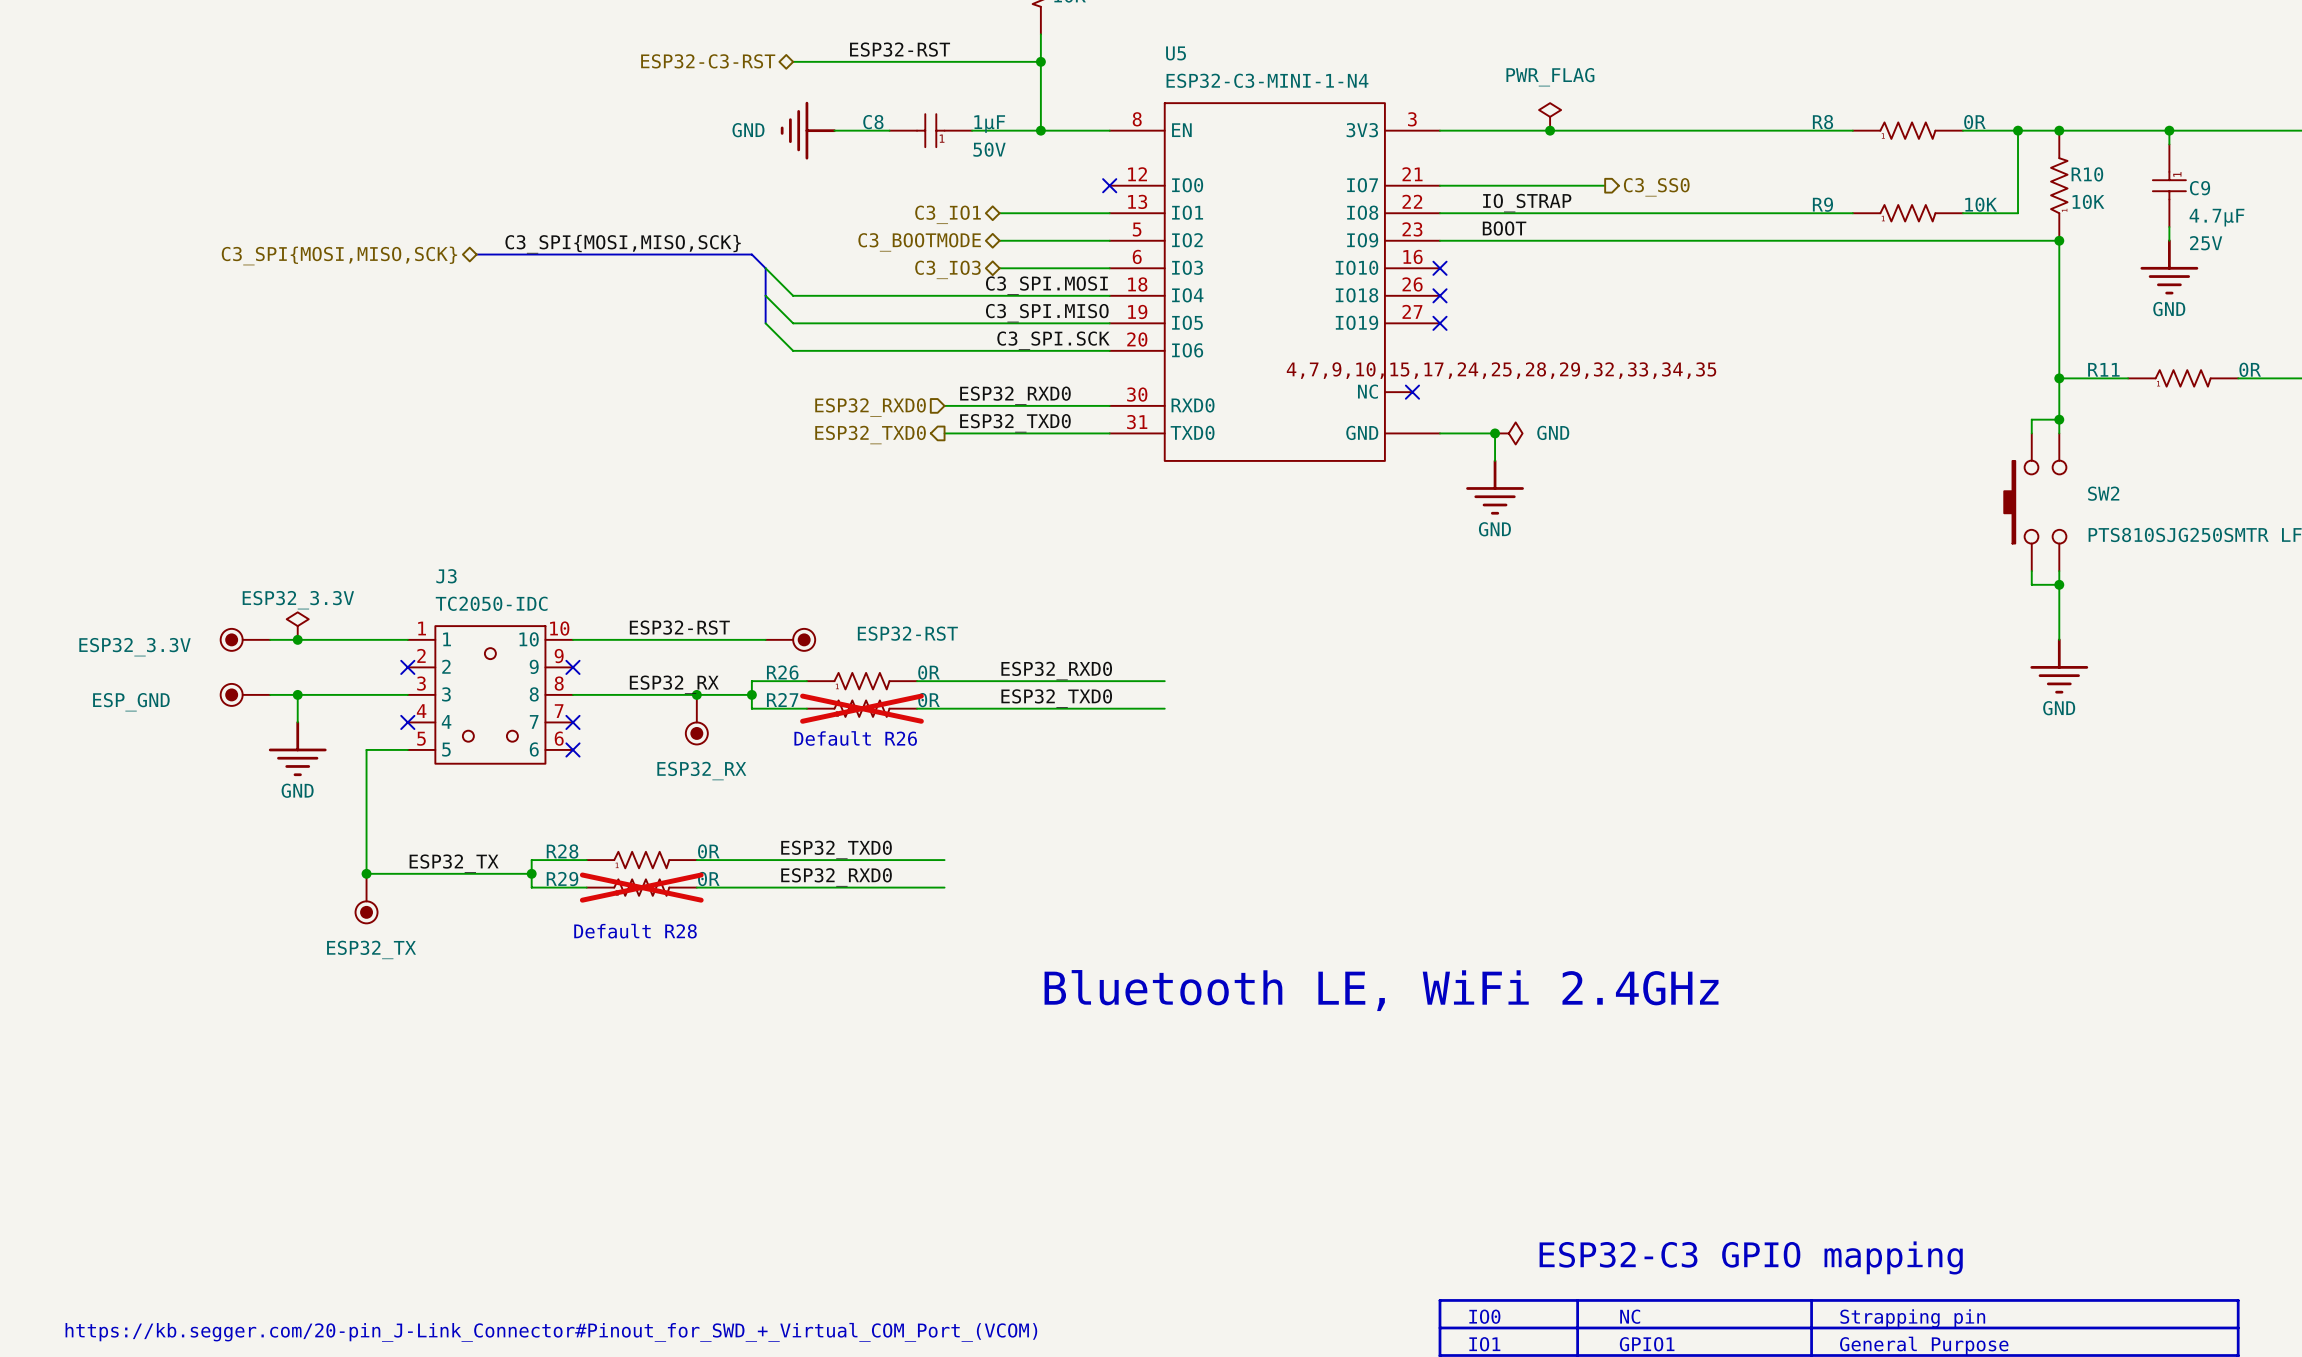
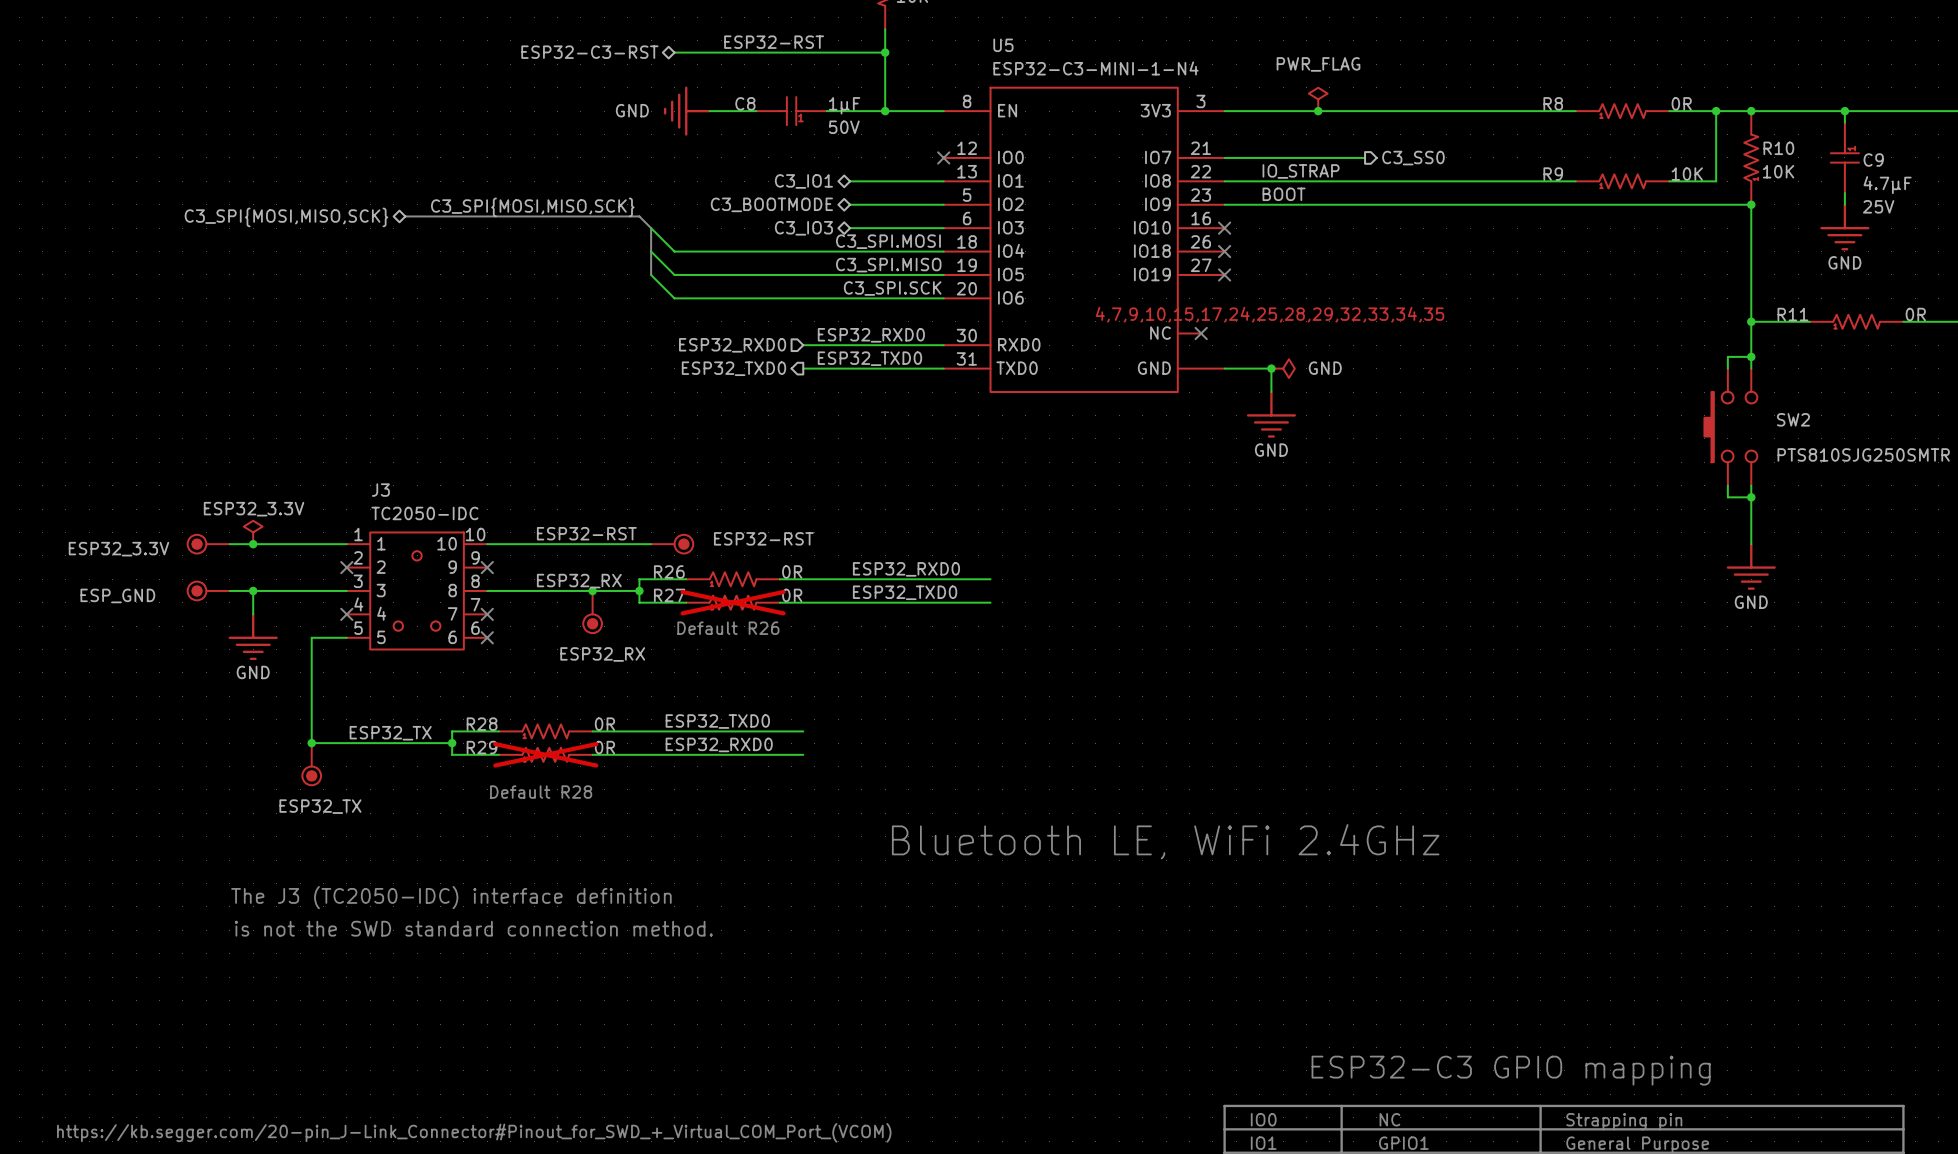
text: none -> The J3 (TC2050-IDC) interface definition (451, 897)
text: none -> is not the SWD standard connection method. (473, 928)

